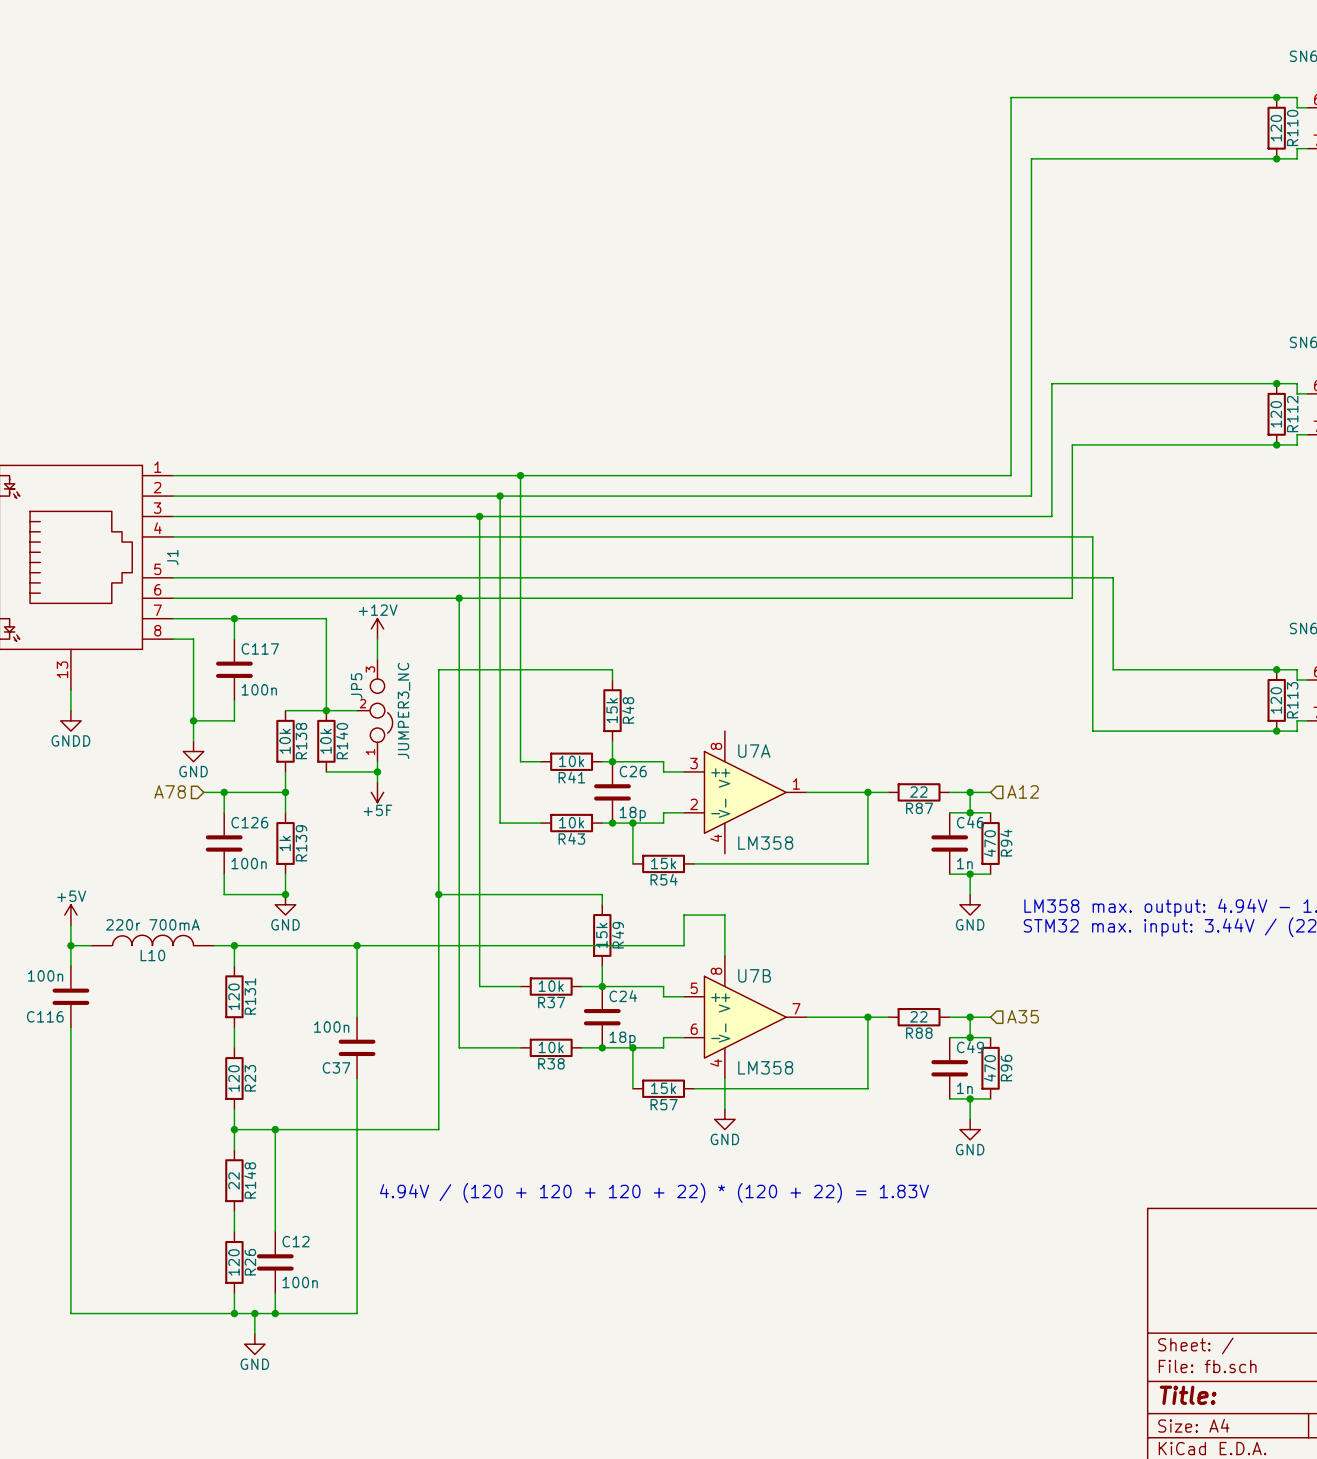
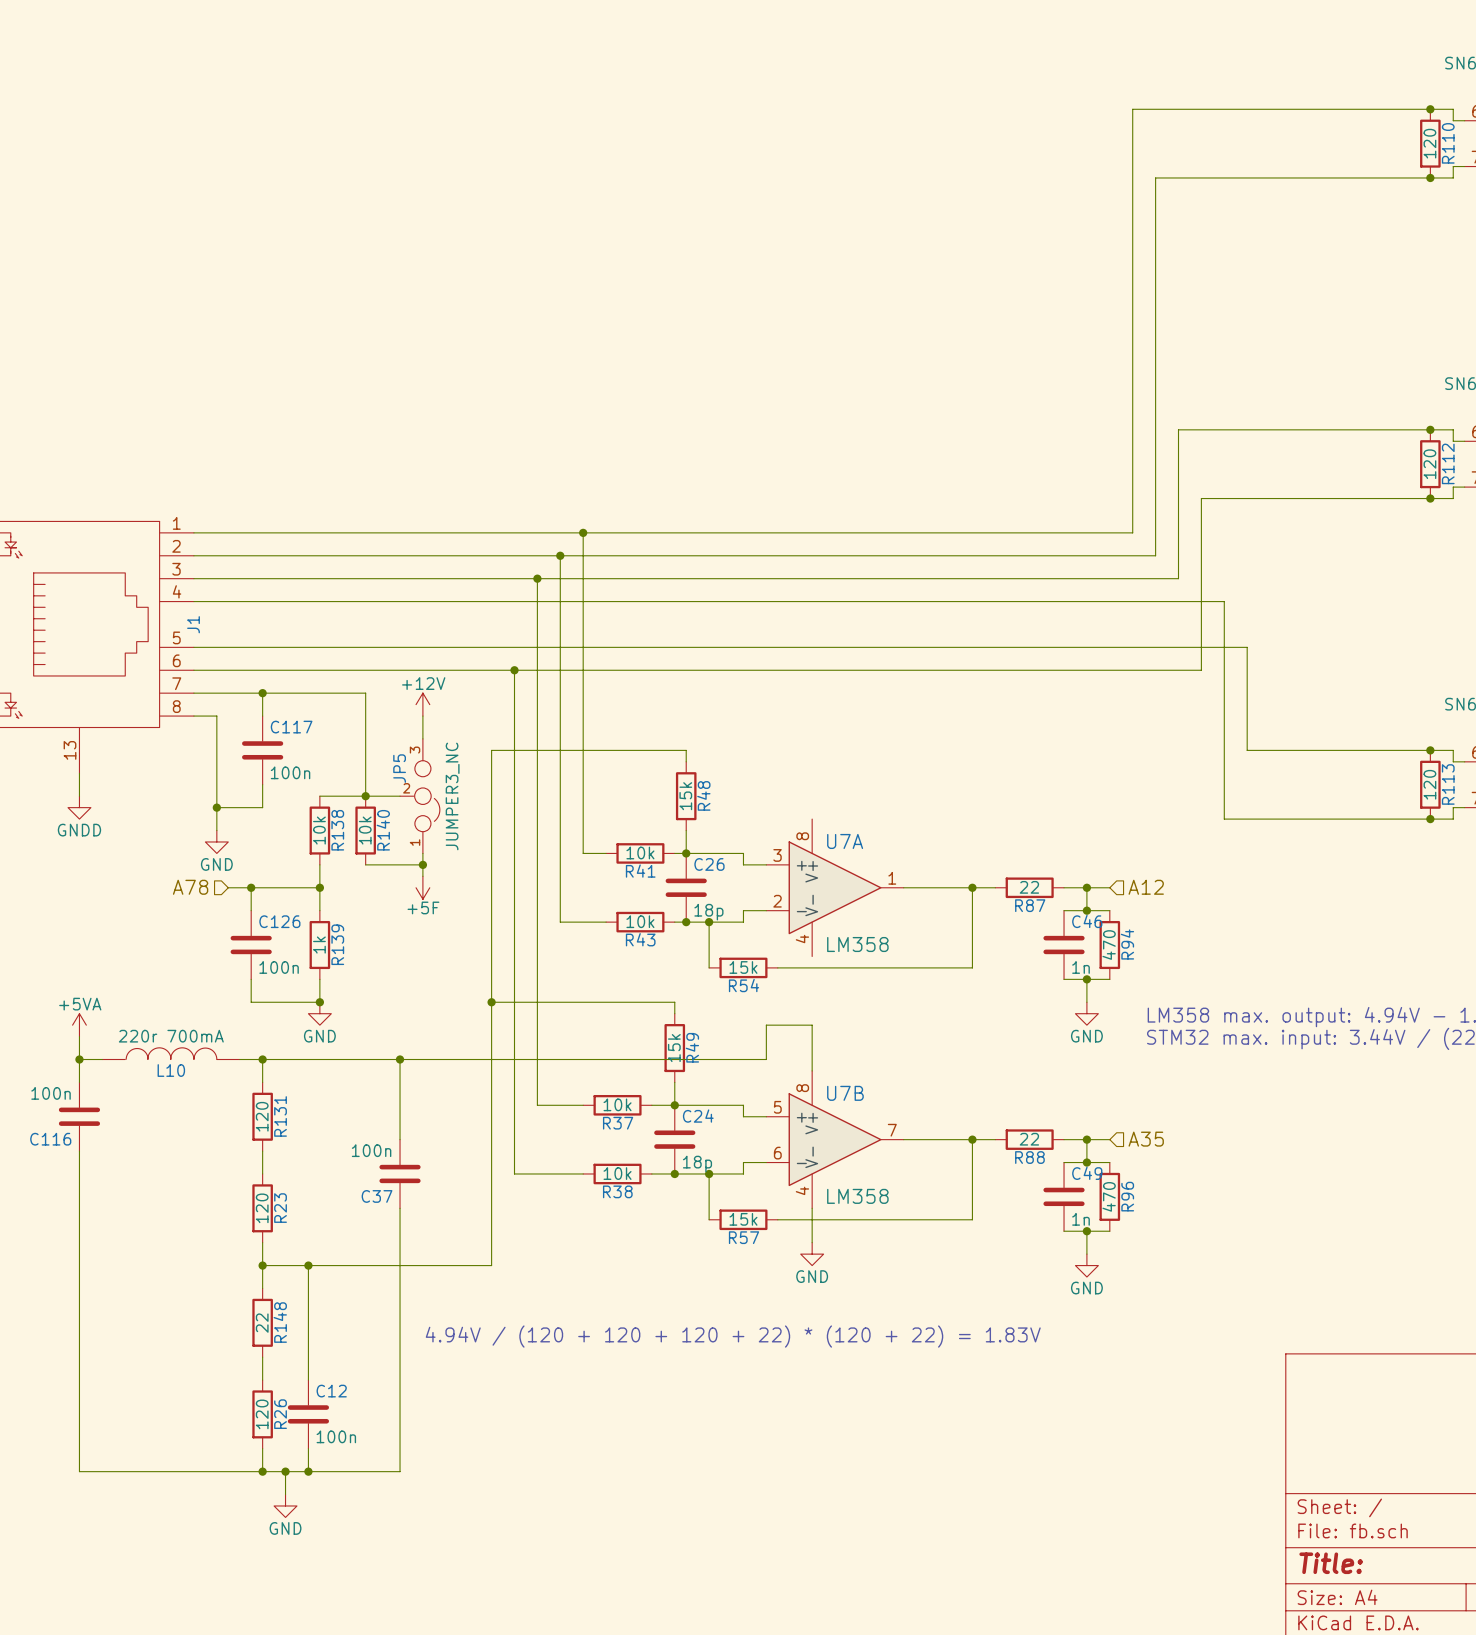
power symbol: +5V (70, 915) -> +5VA (79, 1025)

